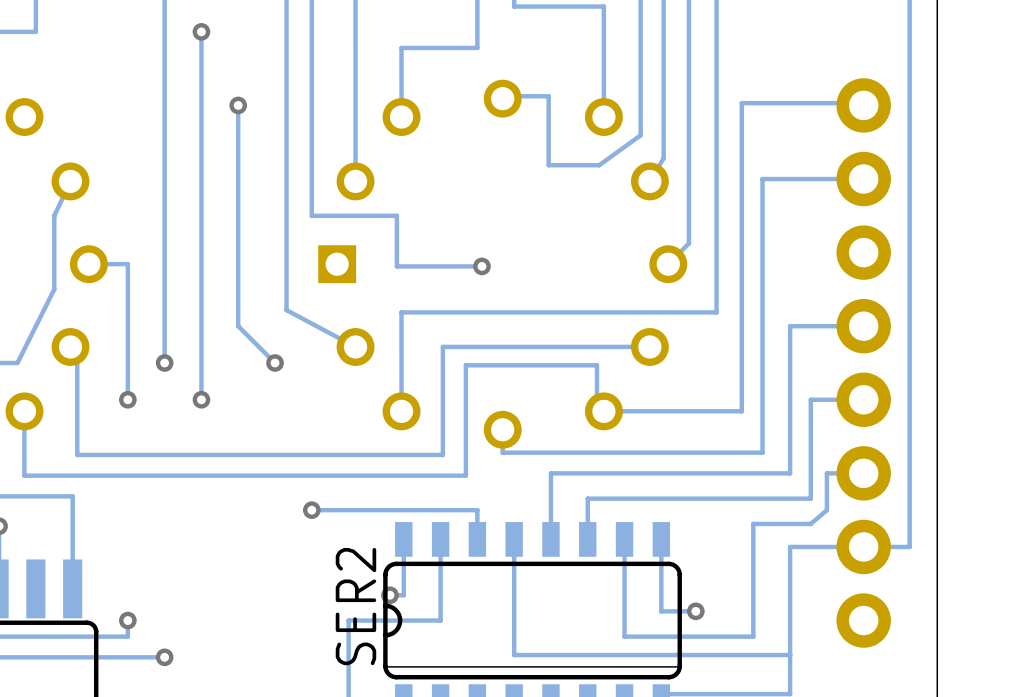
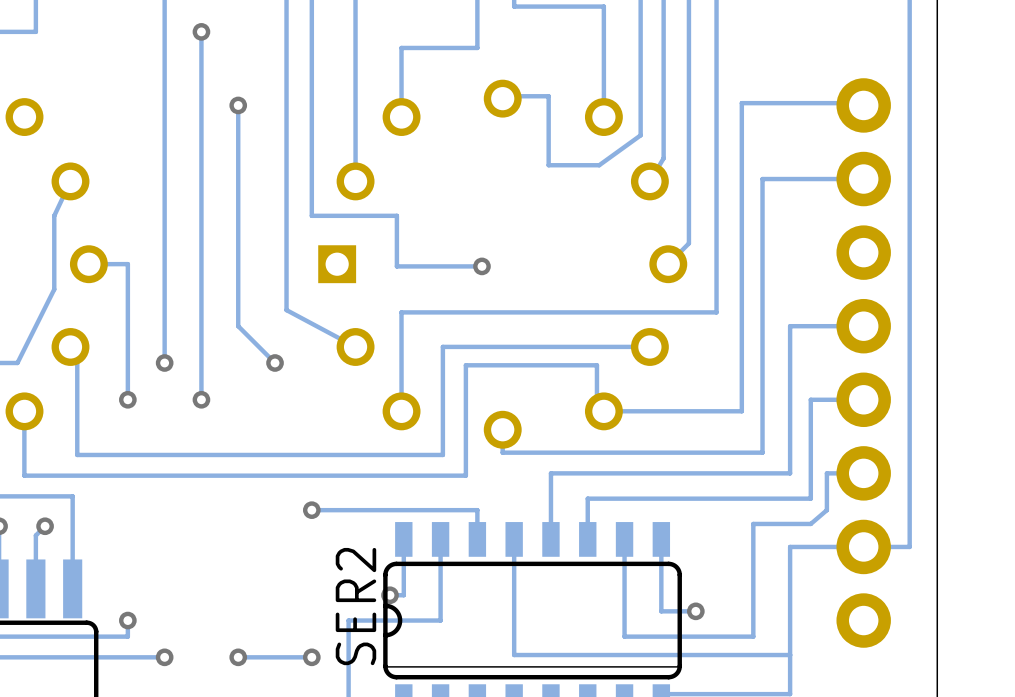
track: none -> (45, 526) (35, 535) (35, 588)
via: none -> (45, 526)
via: none -> (238, 657)
track: none -> (311, 657) (238, 657)
via: none -> (311, 657)

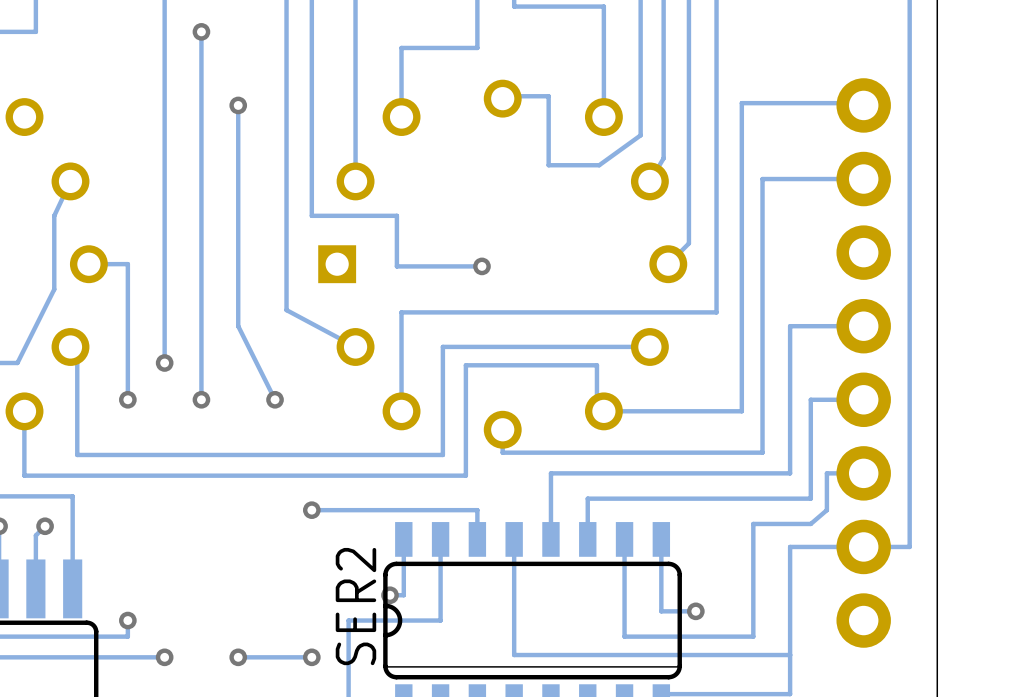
track: (238, 326) (275, 362) -> (238, 326) (275, 399)
via position: (275, 362) -> (275, 399)

